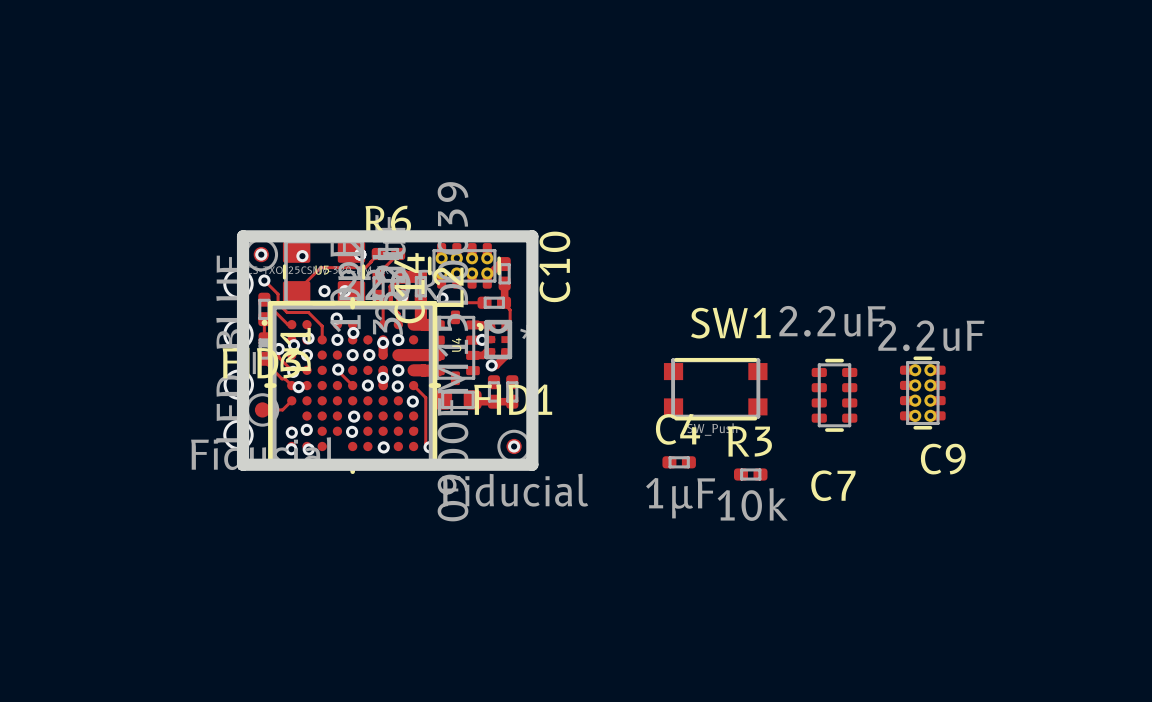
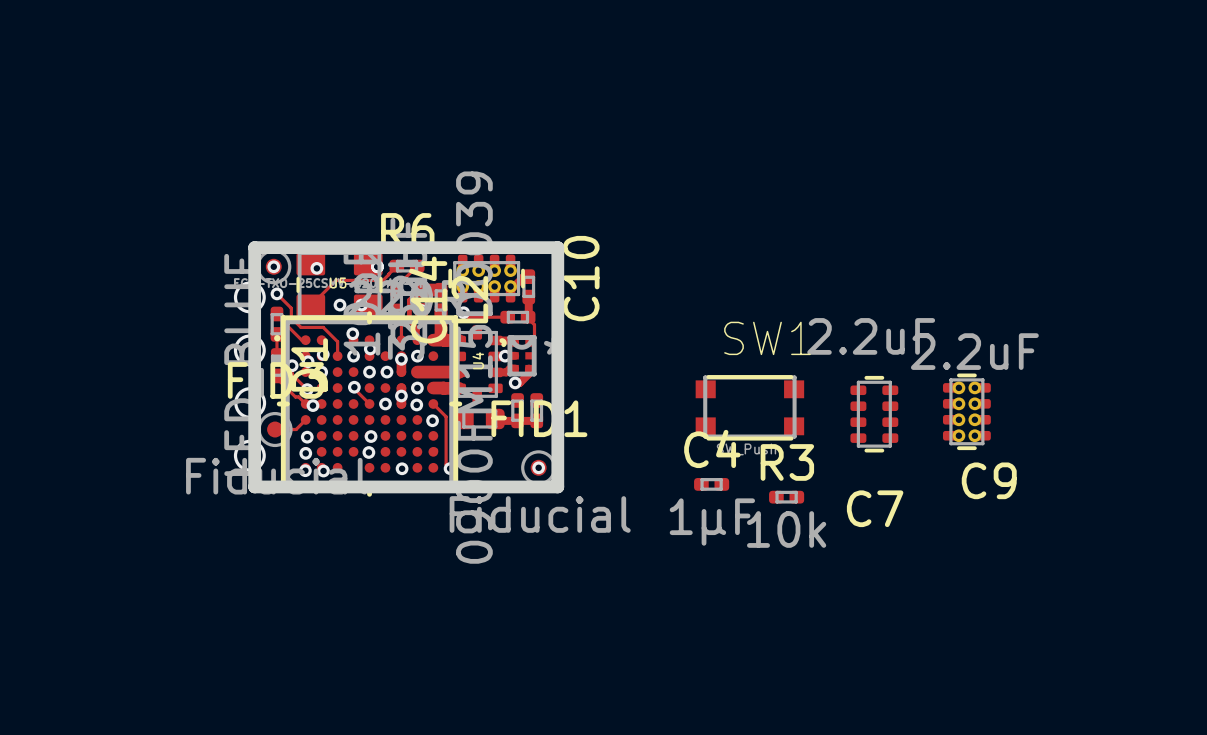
via position: (306, 429) -> (307, 437)

